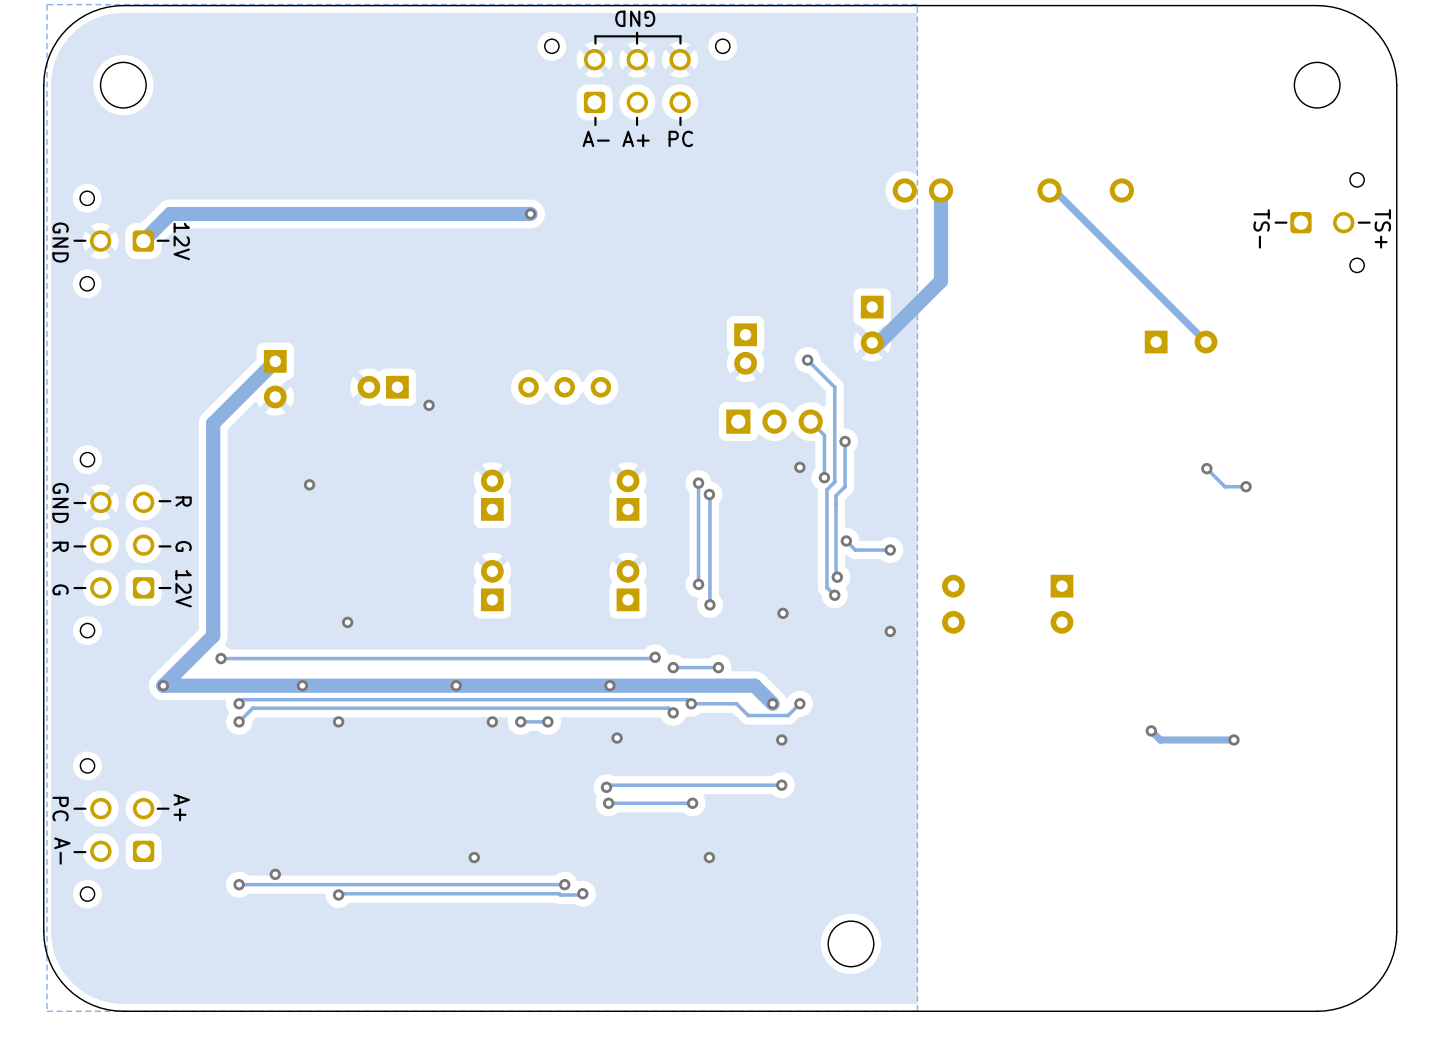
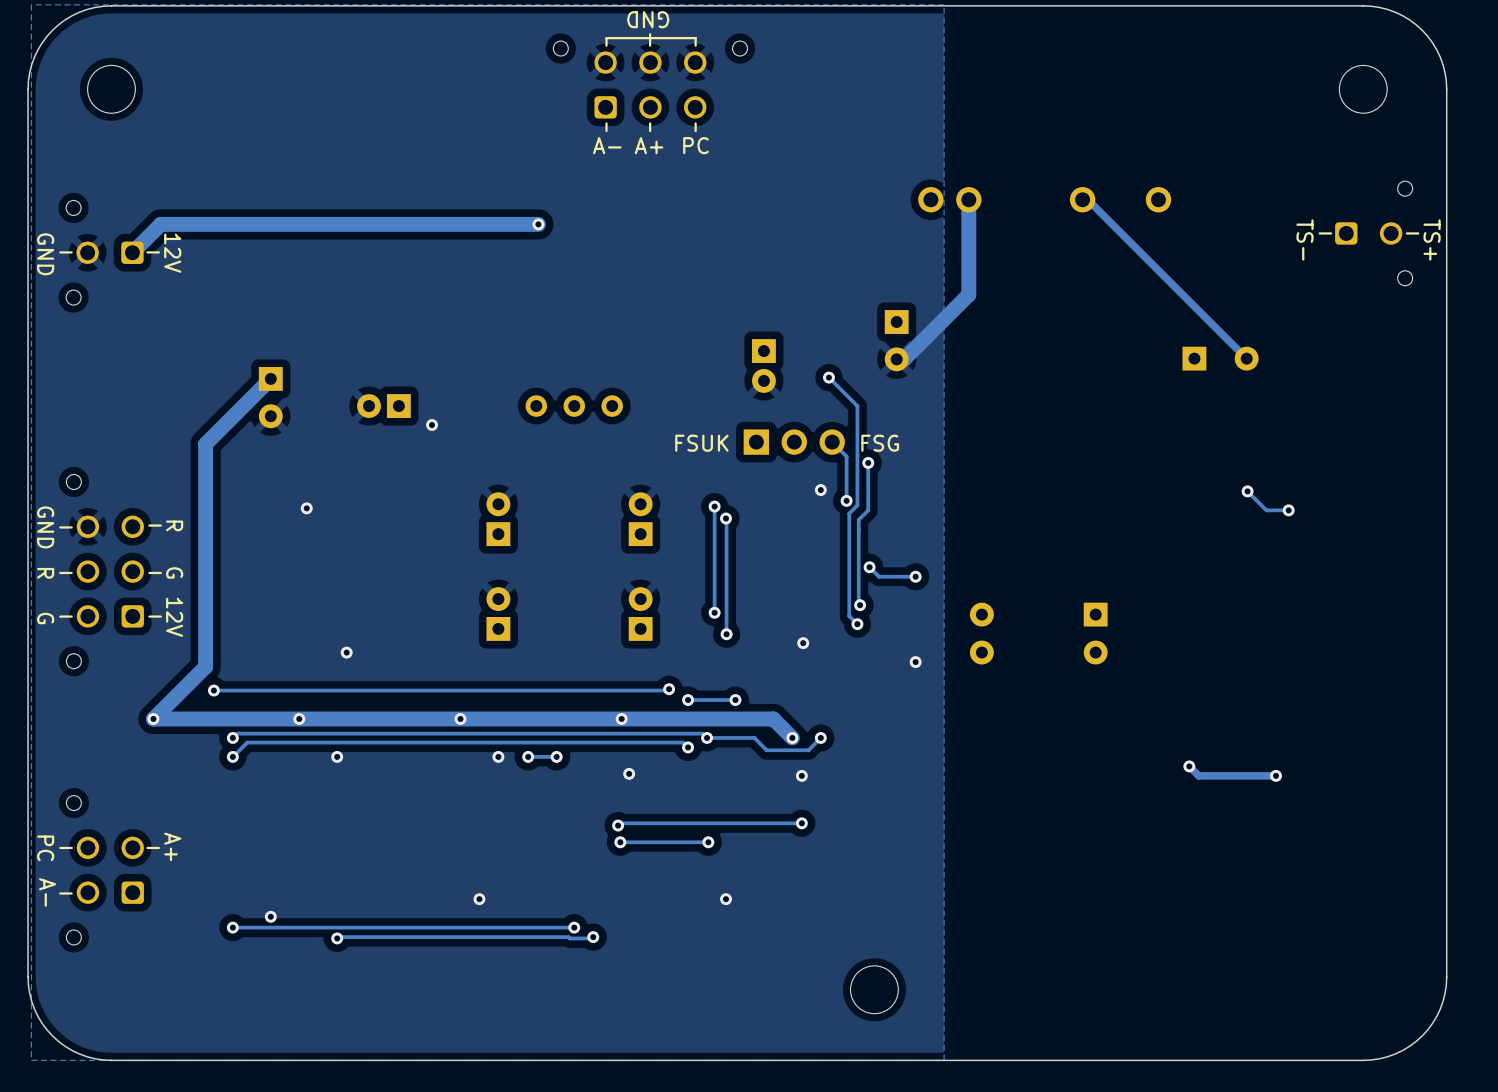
text: none -> FSUK (701, 443)
text: none -> FSG (880, 443)

